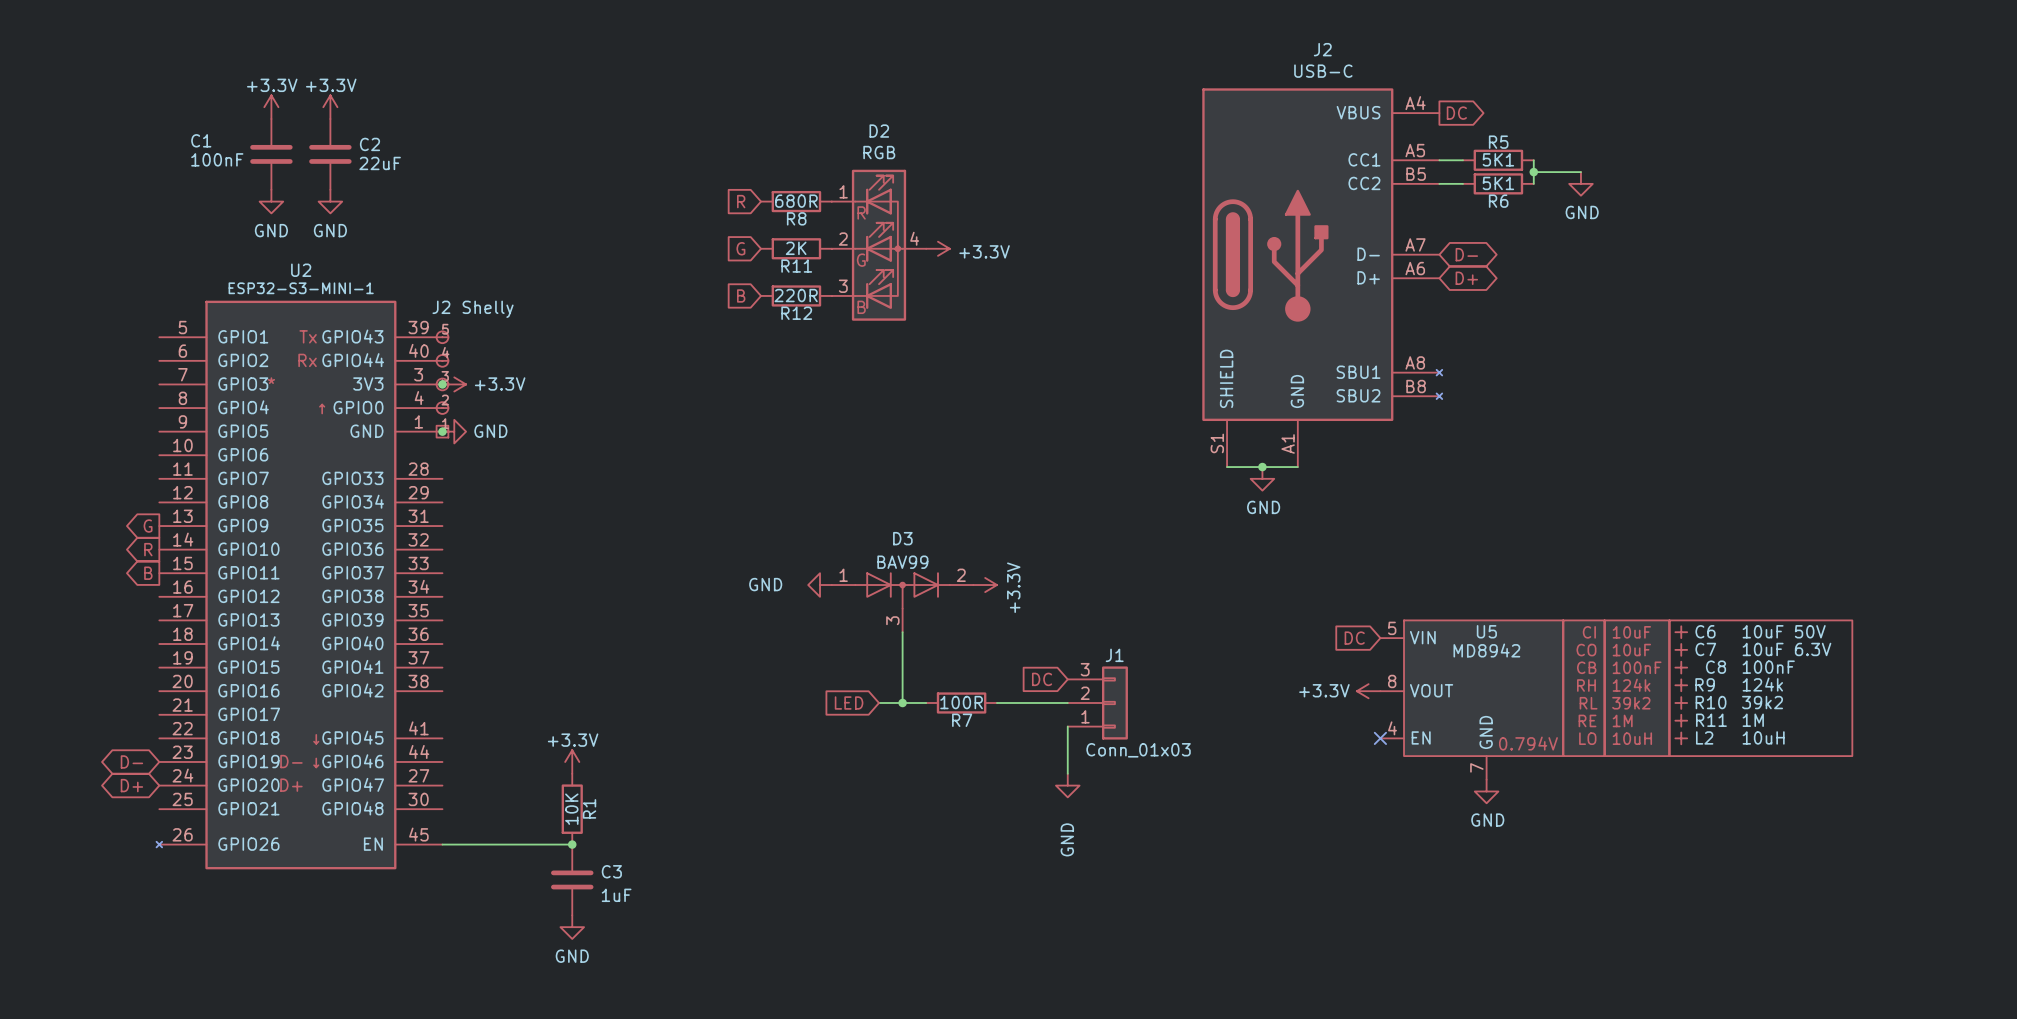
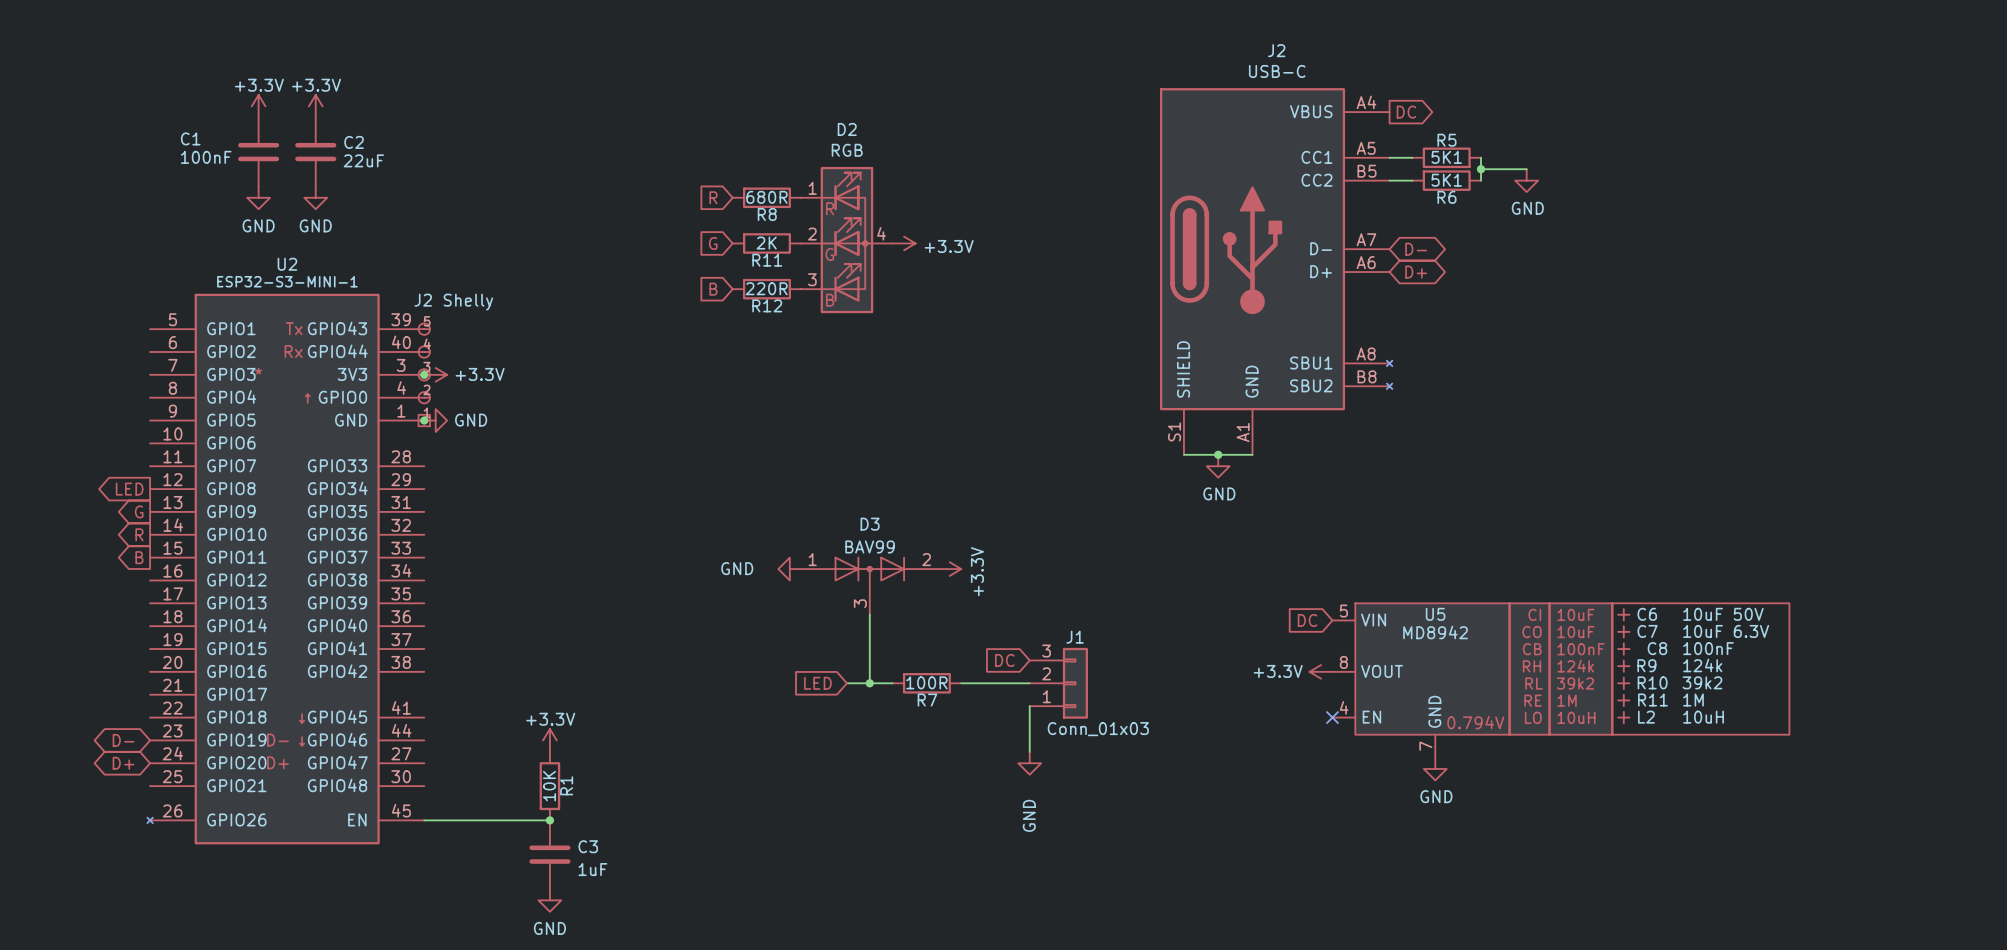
global label: none -> LED (129, 489)

